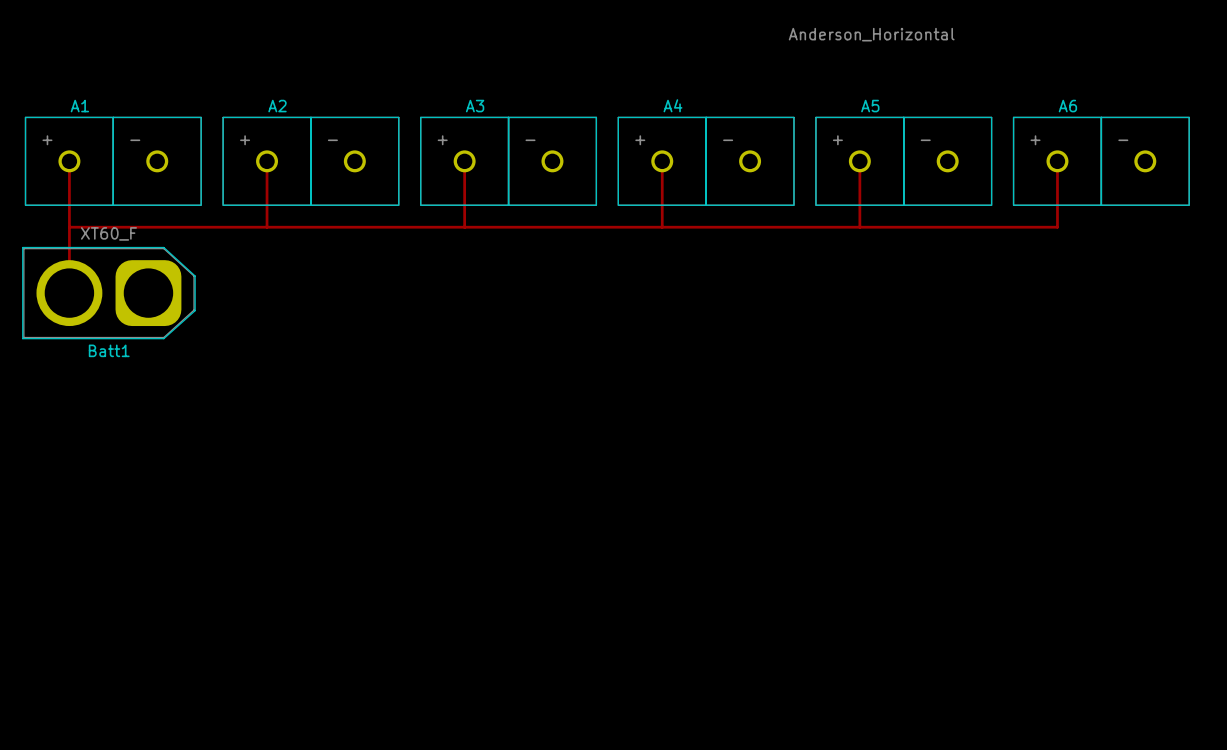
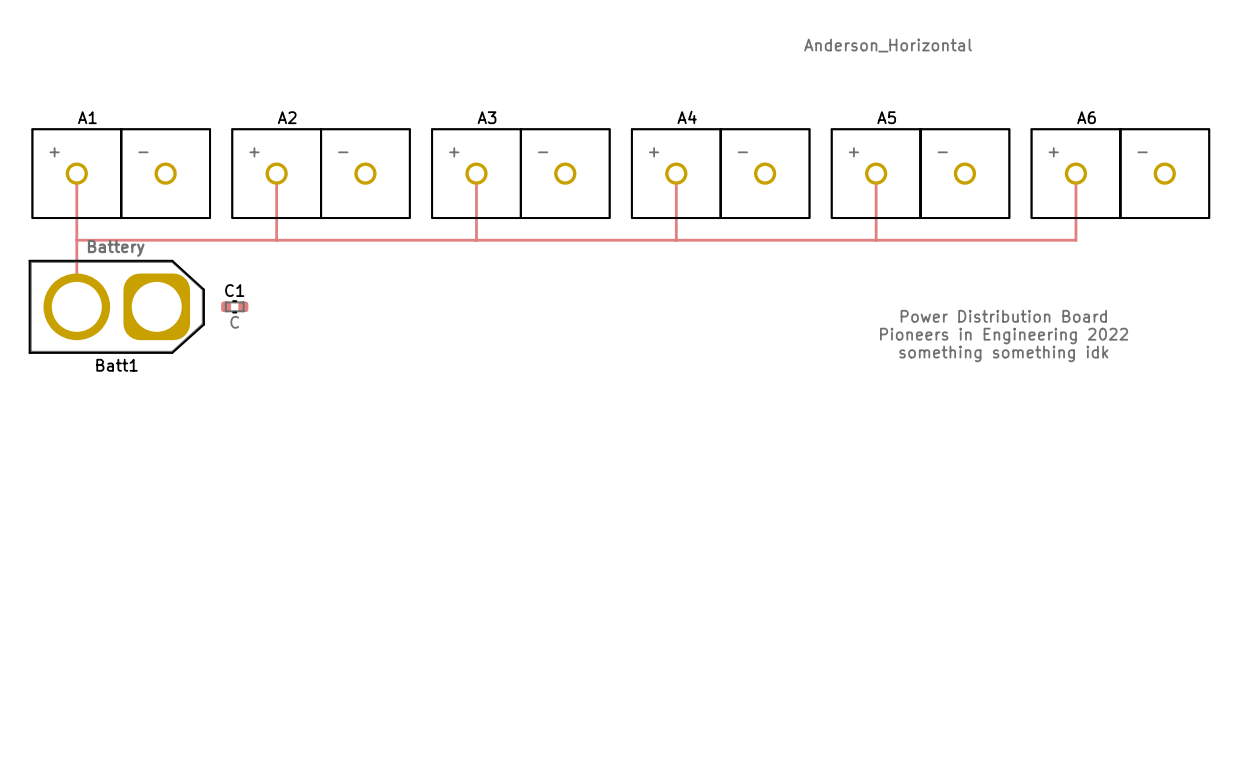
Batt1 value: XT60_F (108, 233) -> Battery (116, 248)
C1: none -> C (234, 306)
text: none -> Power Distribution Board (1003, 316)
text: none -> Pioneers in Engineering 2022 (1004, 336)
text: none -> something something idk (1003, 353)

